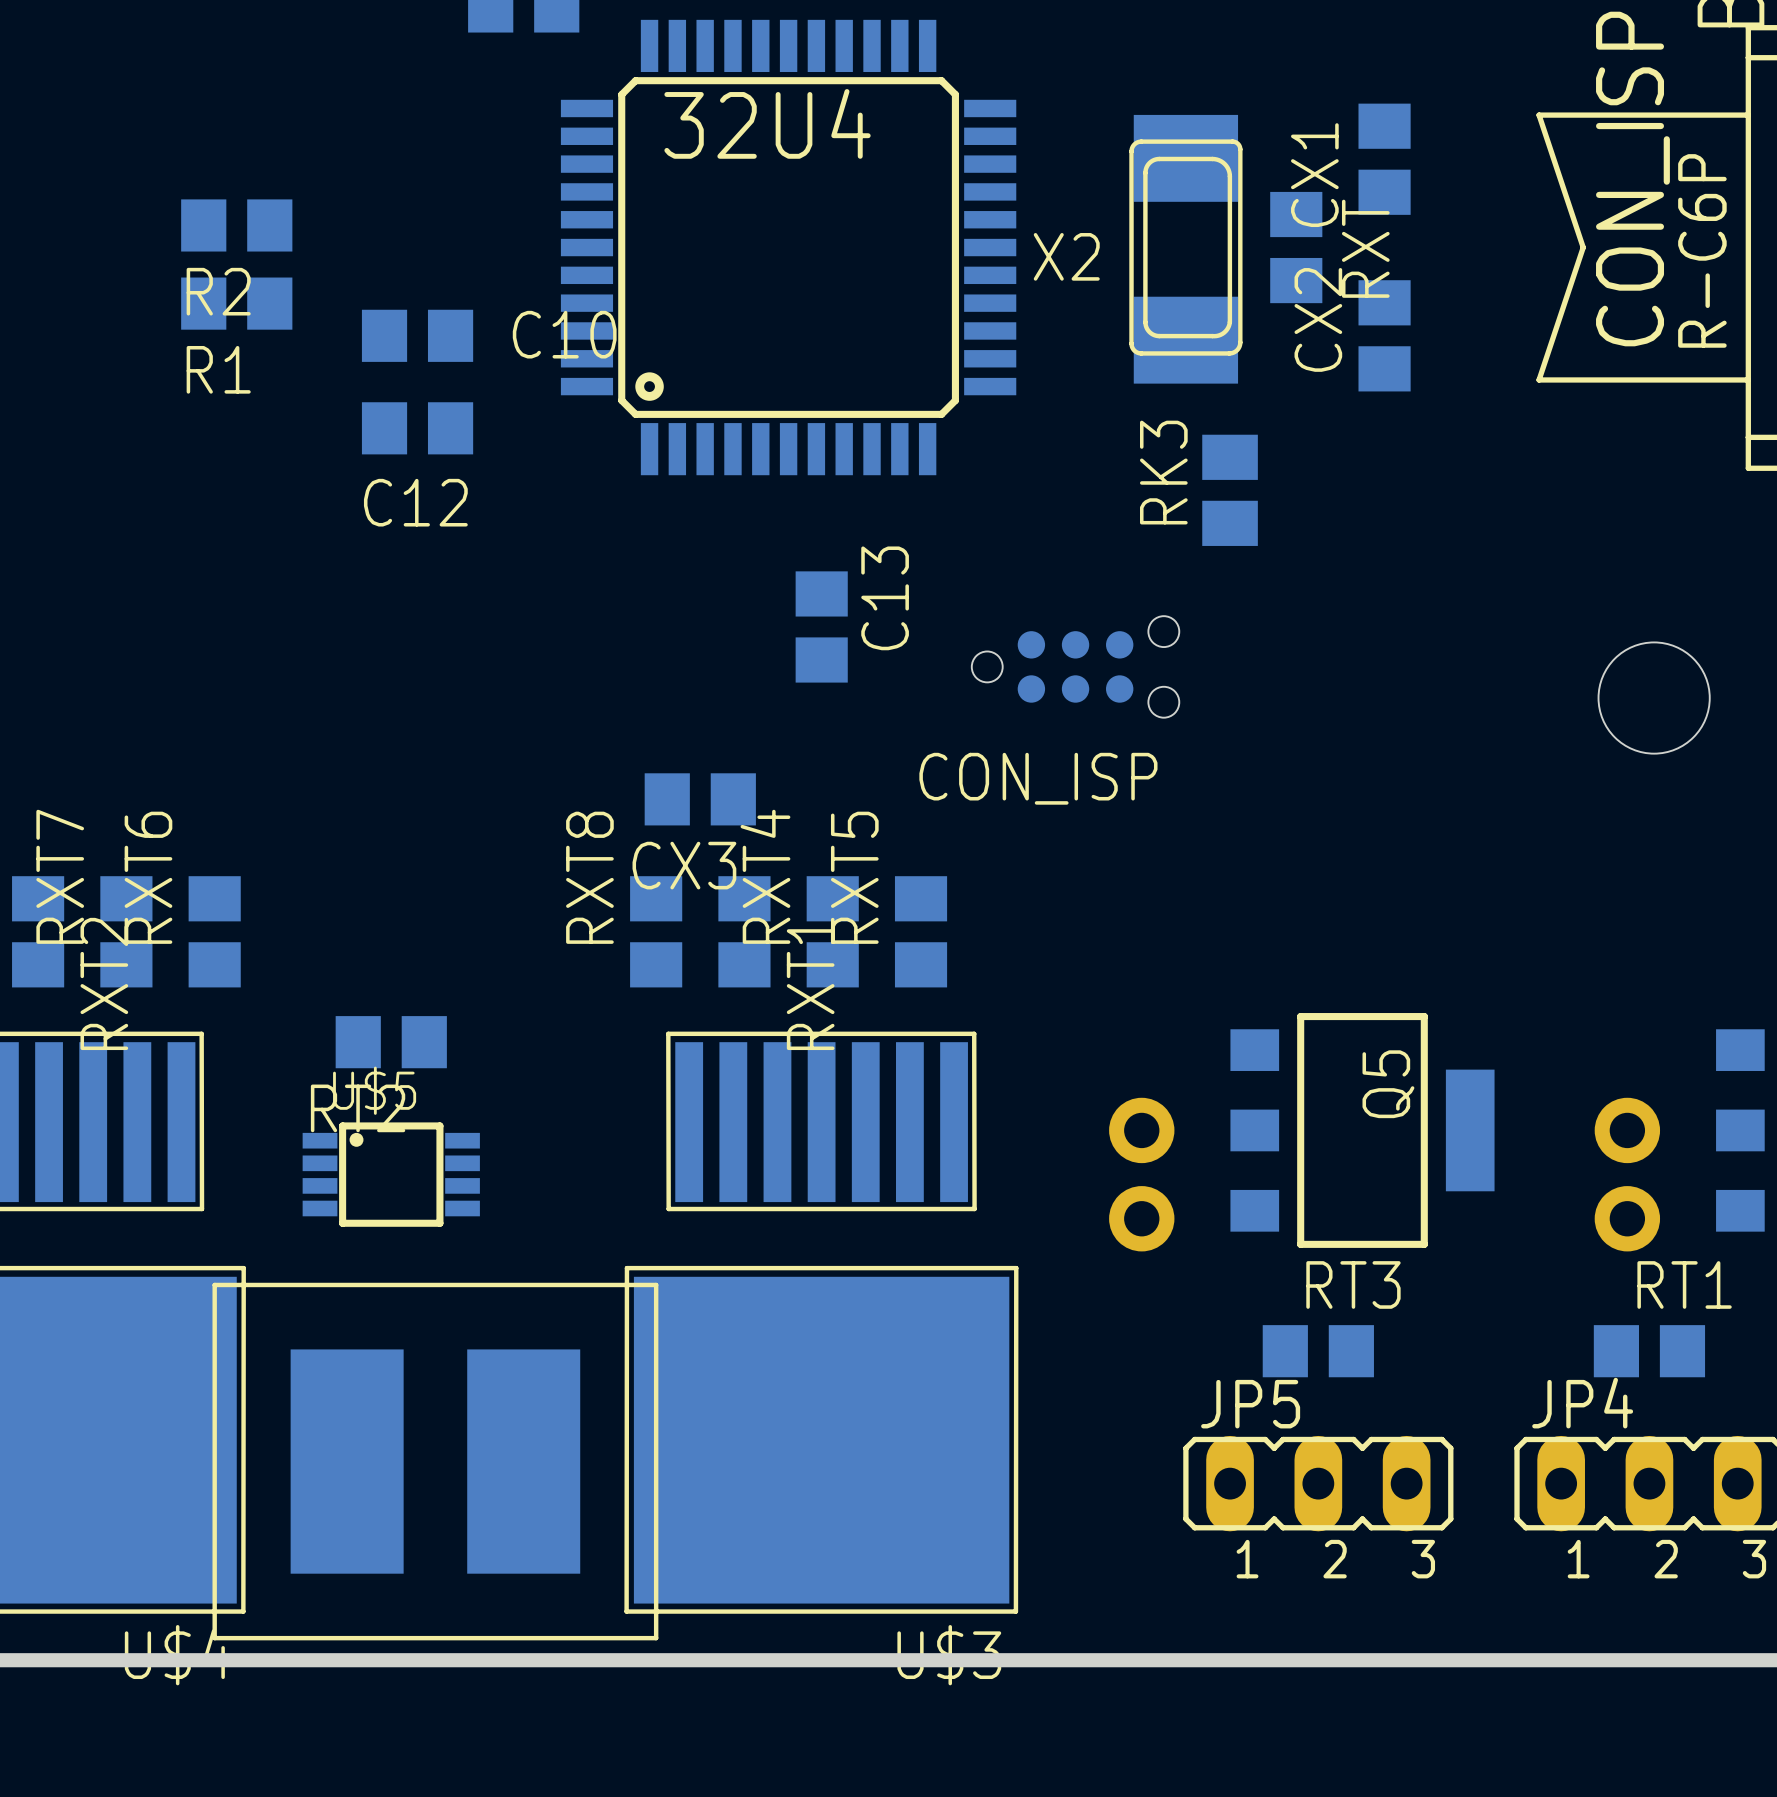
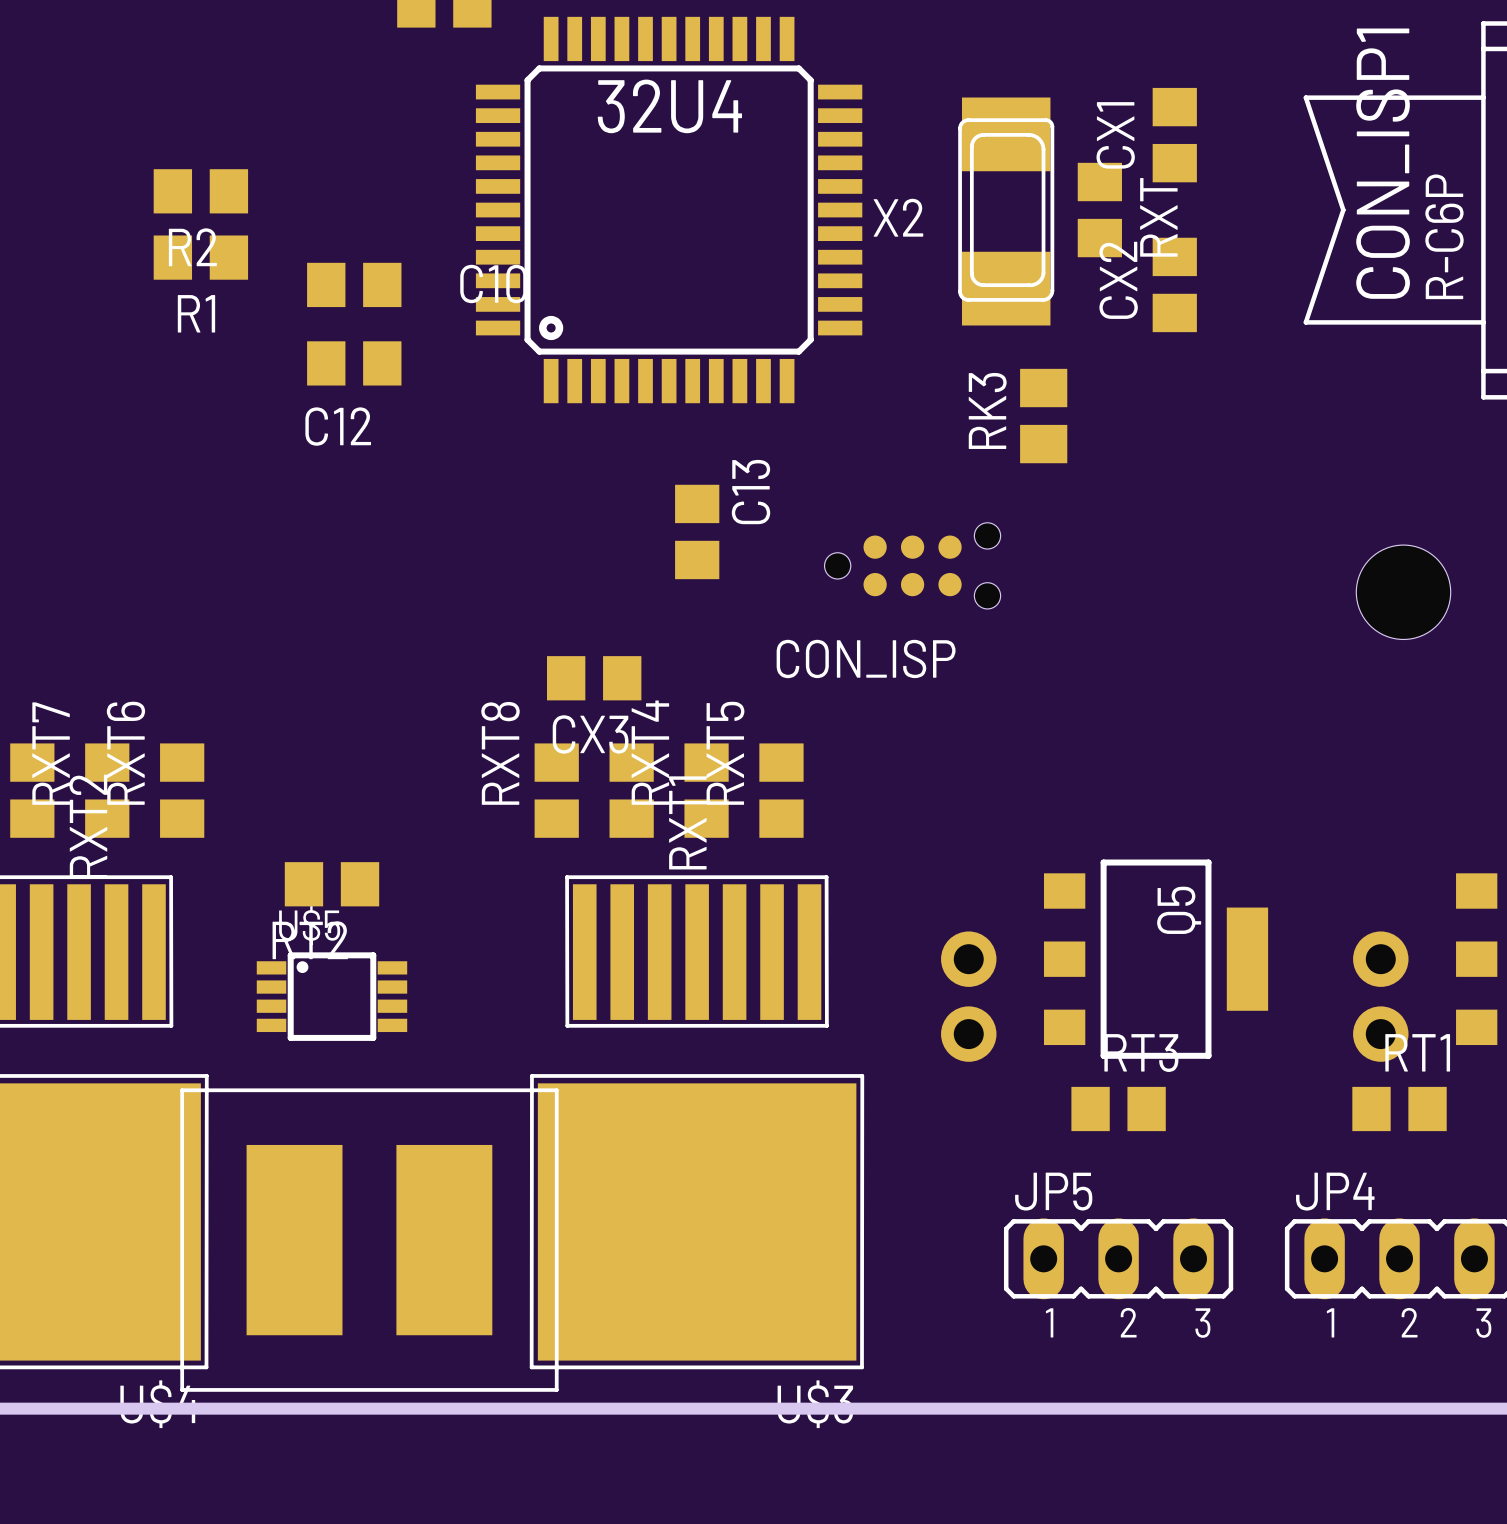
RT3 position: (1318, 1351) -> (1118, 1109)
RT1 position: (1649, 1351) -> (1399, 1109)

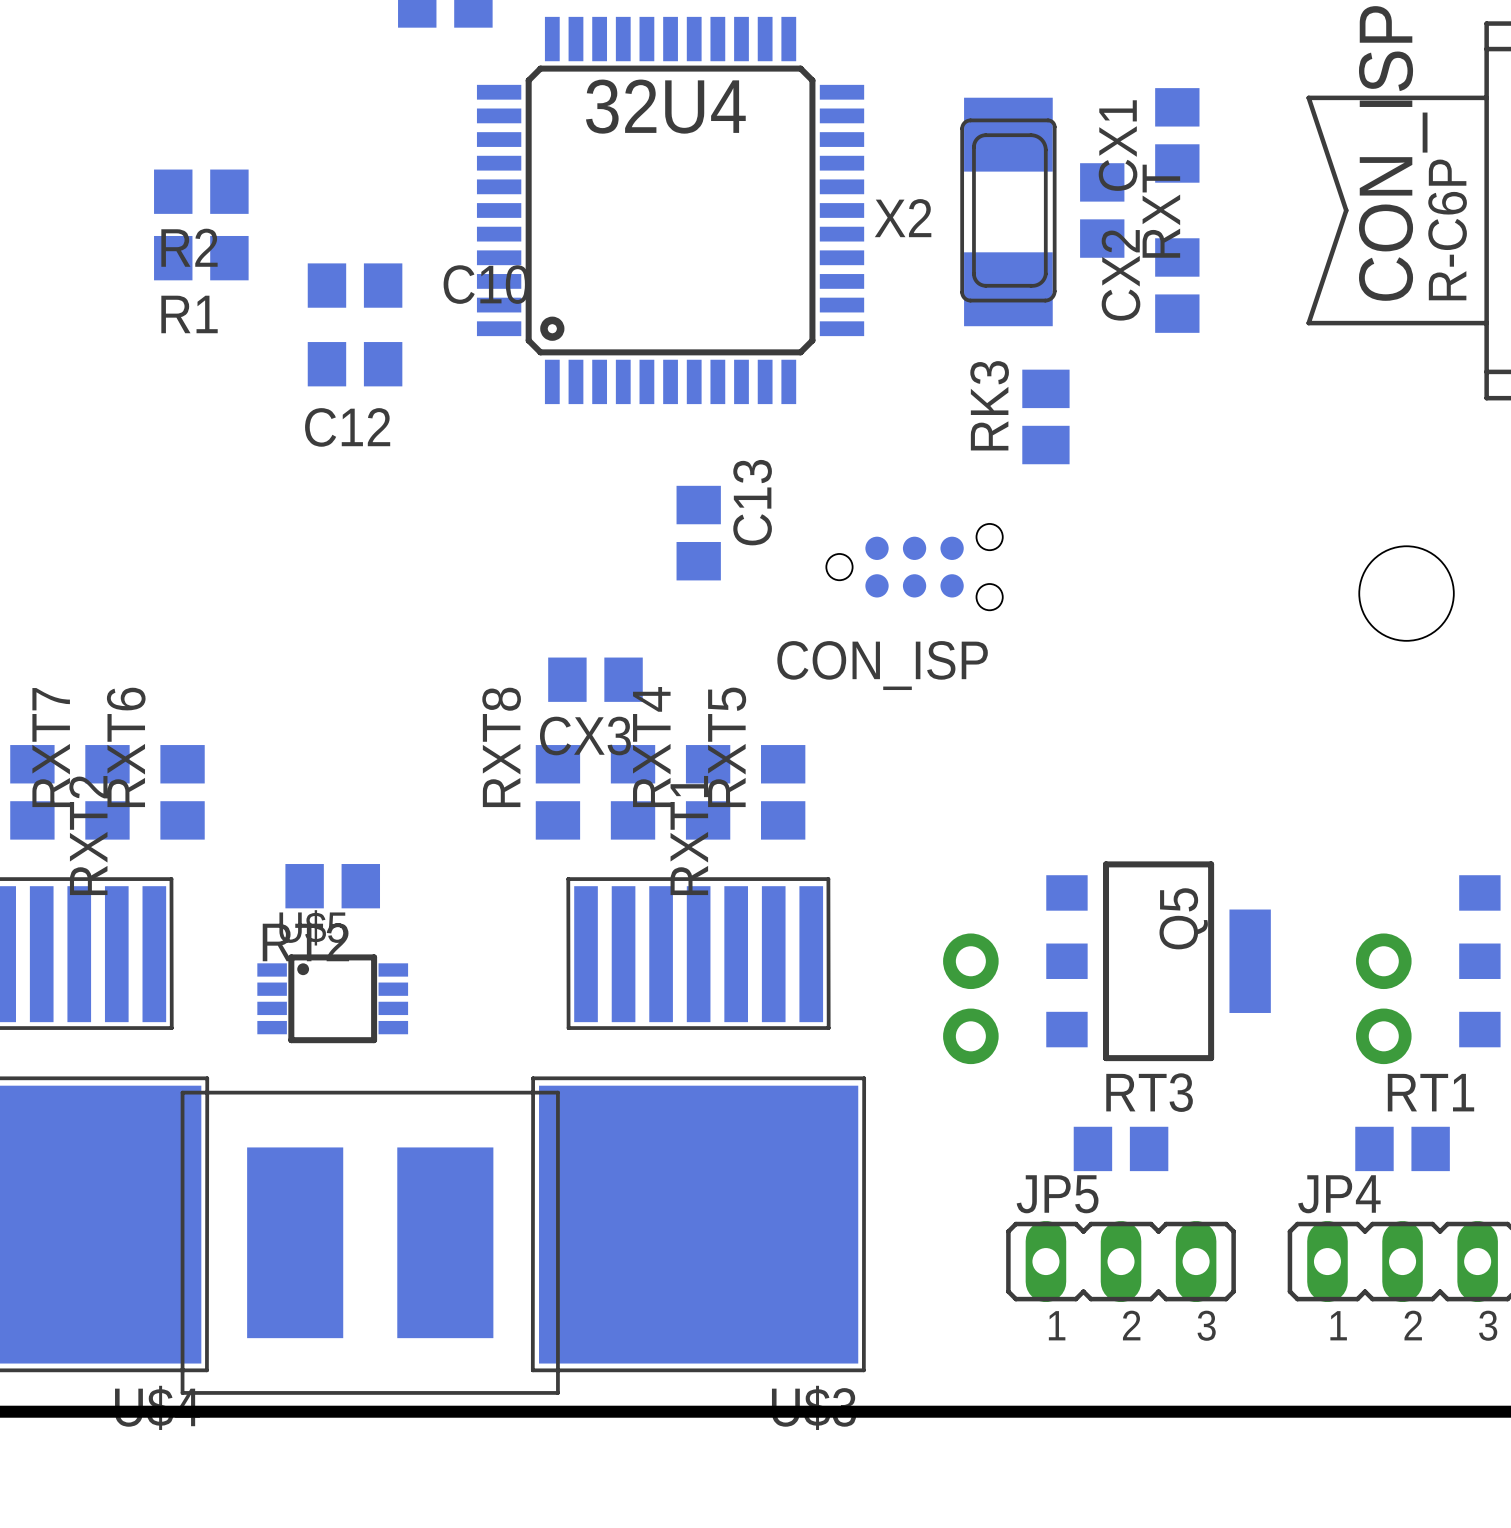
RT3 position: (1118, 1109) -> (1121, 1148)
RT1 position: (1399, 1109) -> (1402, 1148)

